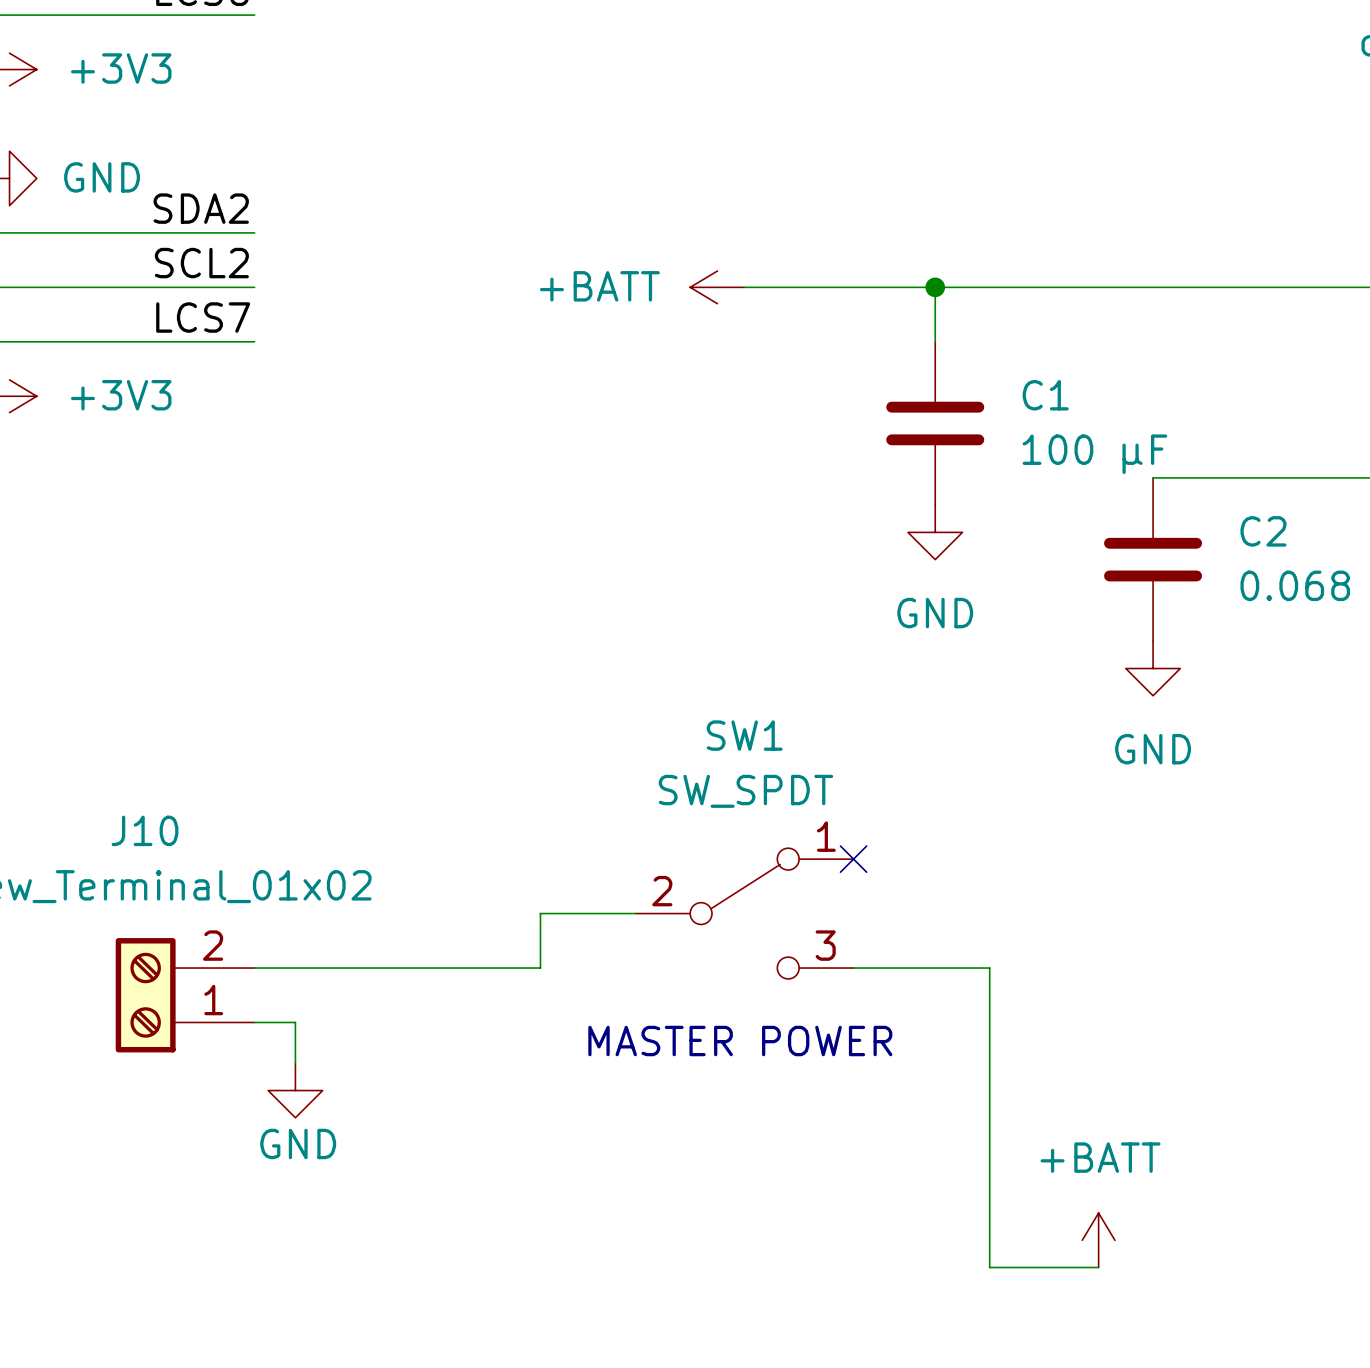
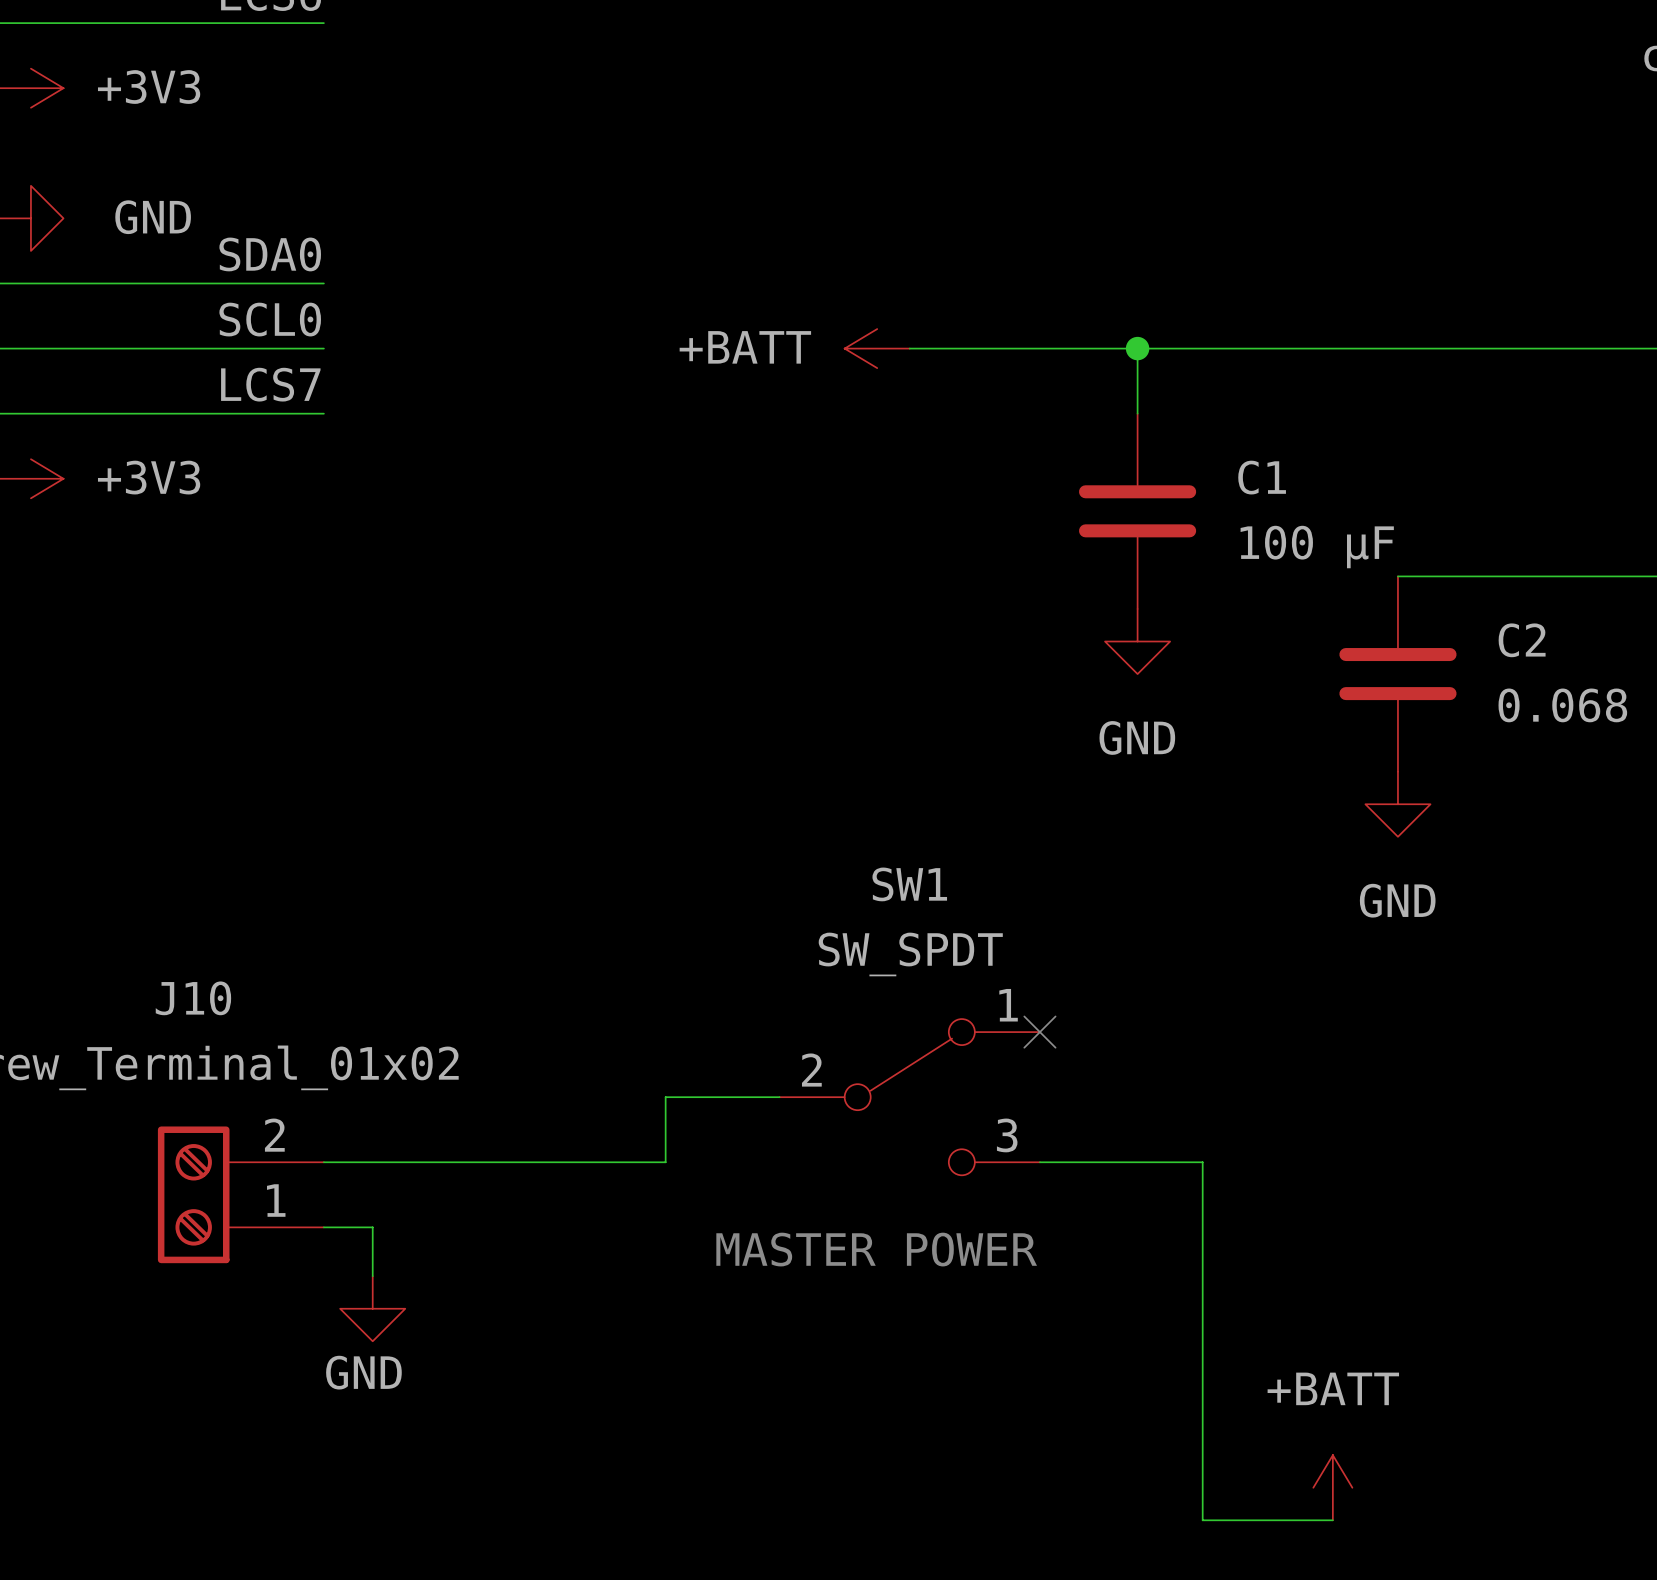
label: SDA2 (201, 208) -> SDA0 (270, 254)
label: SCL2 (201, 263) -> SCL0 (270, 319)

